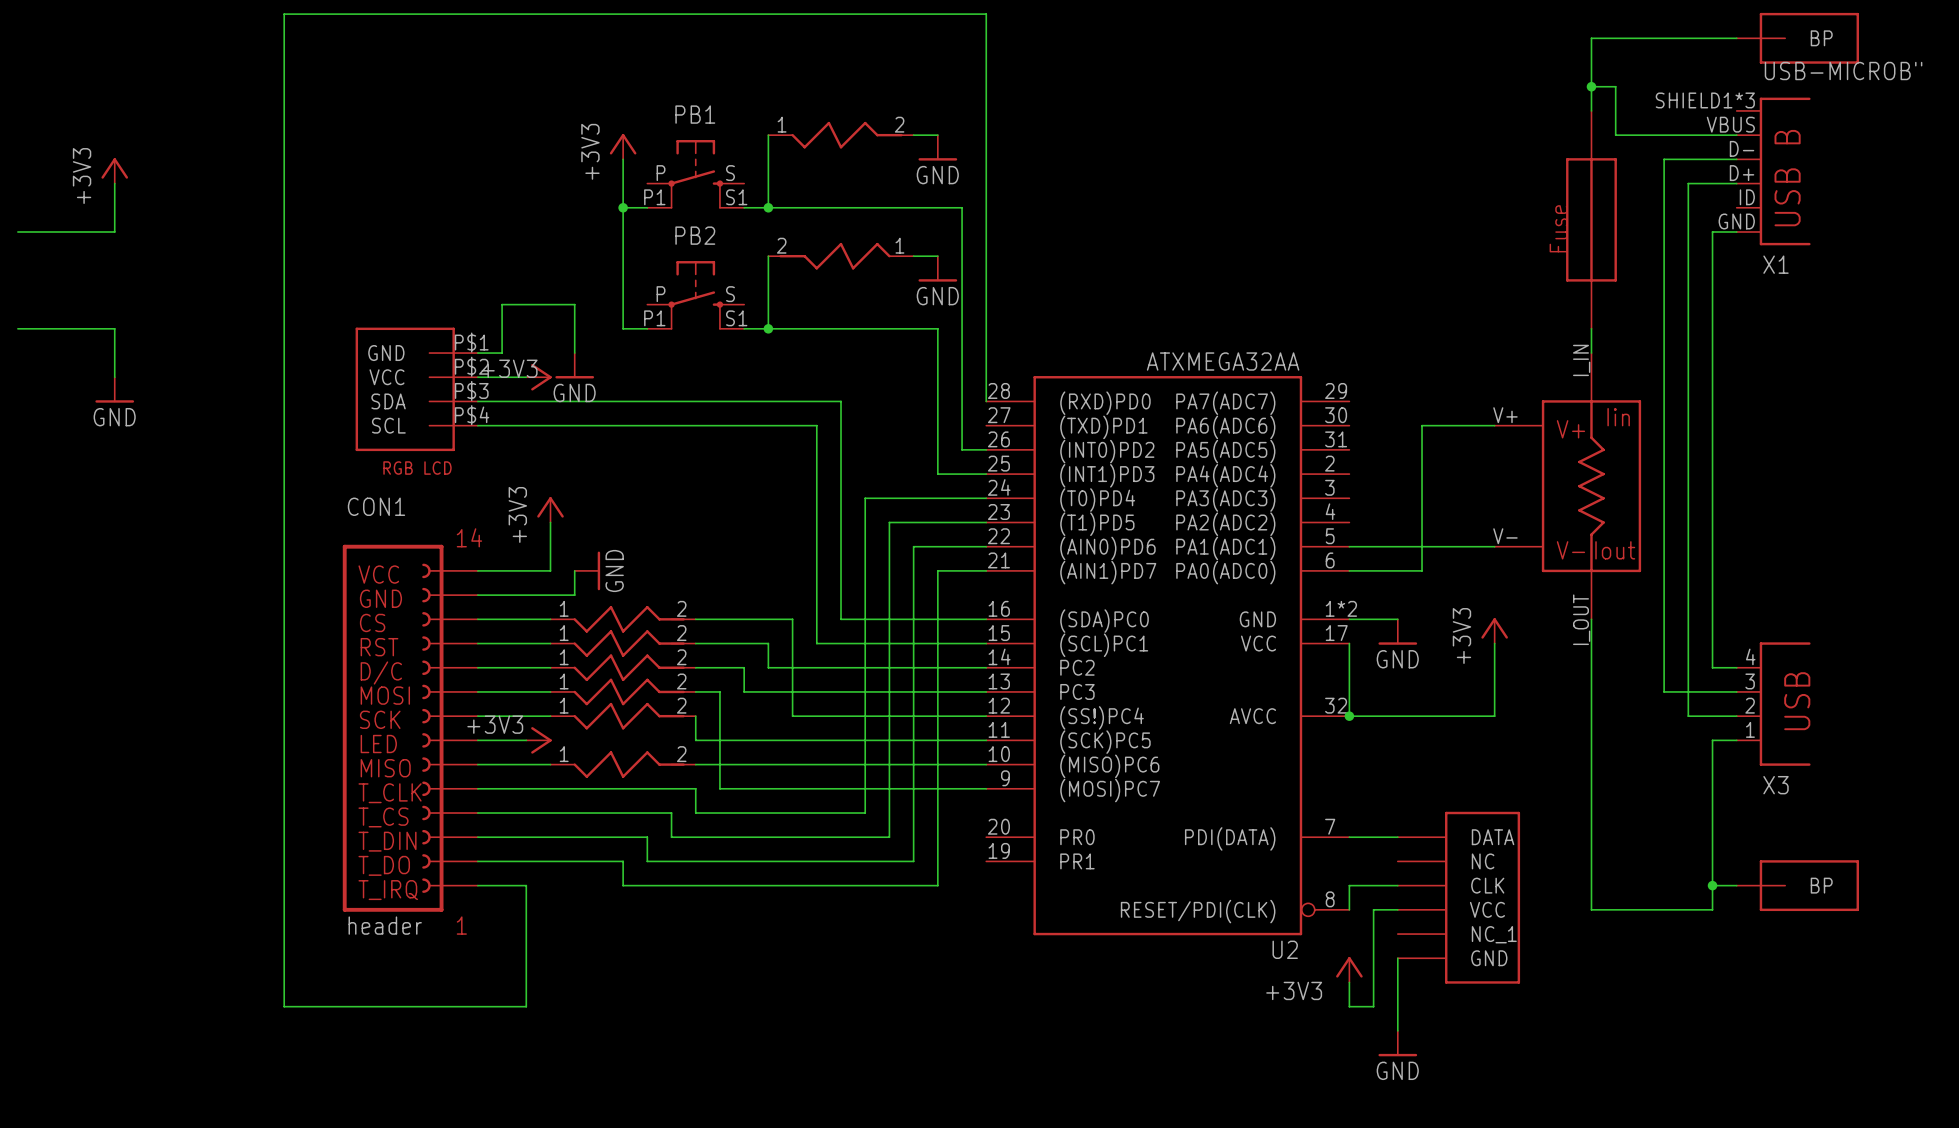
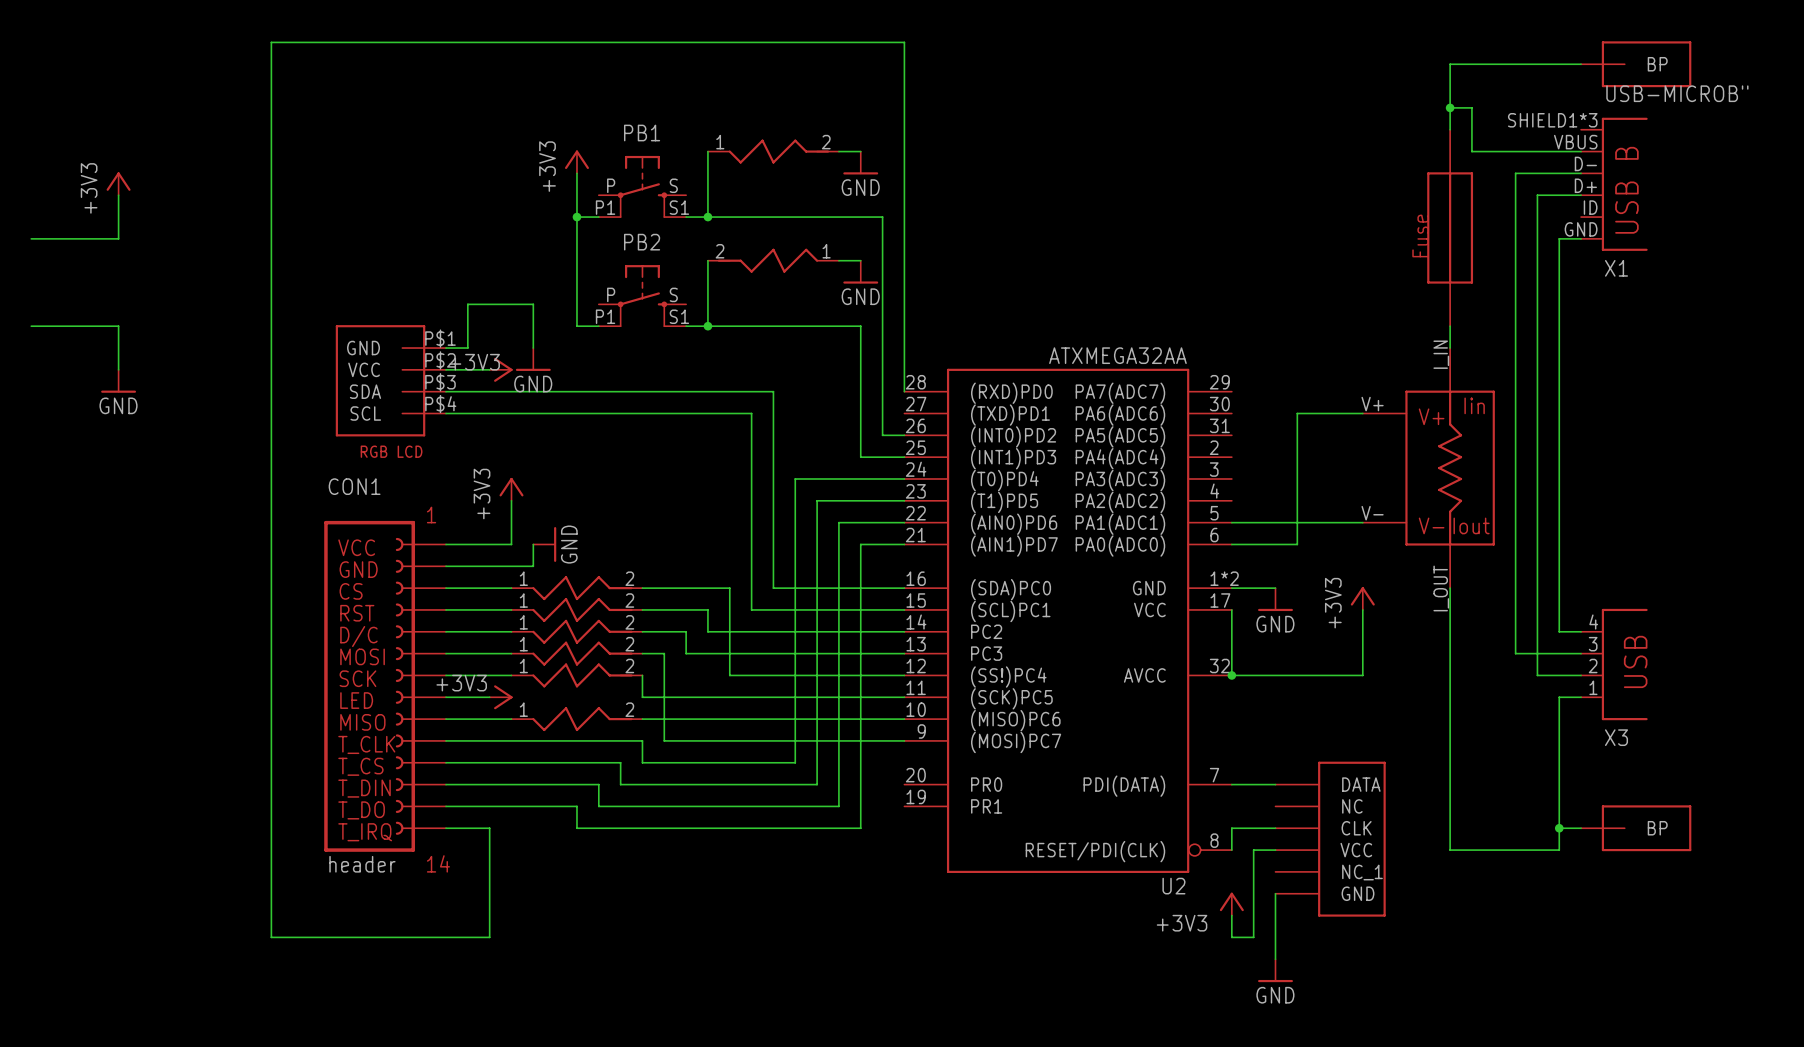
CON1 text: 14 (469, 537) -> 1 (431, 515)
CON1 text: 1 (461, 925) -> 14 (438, 863)

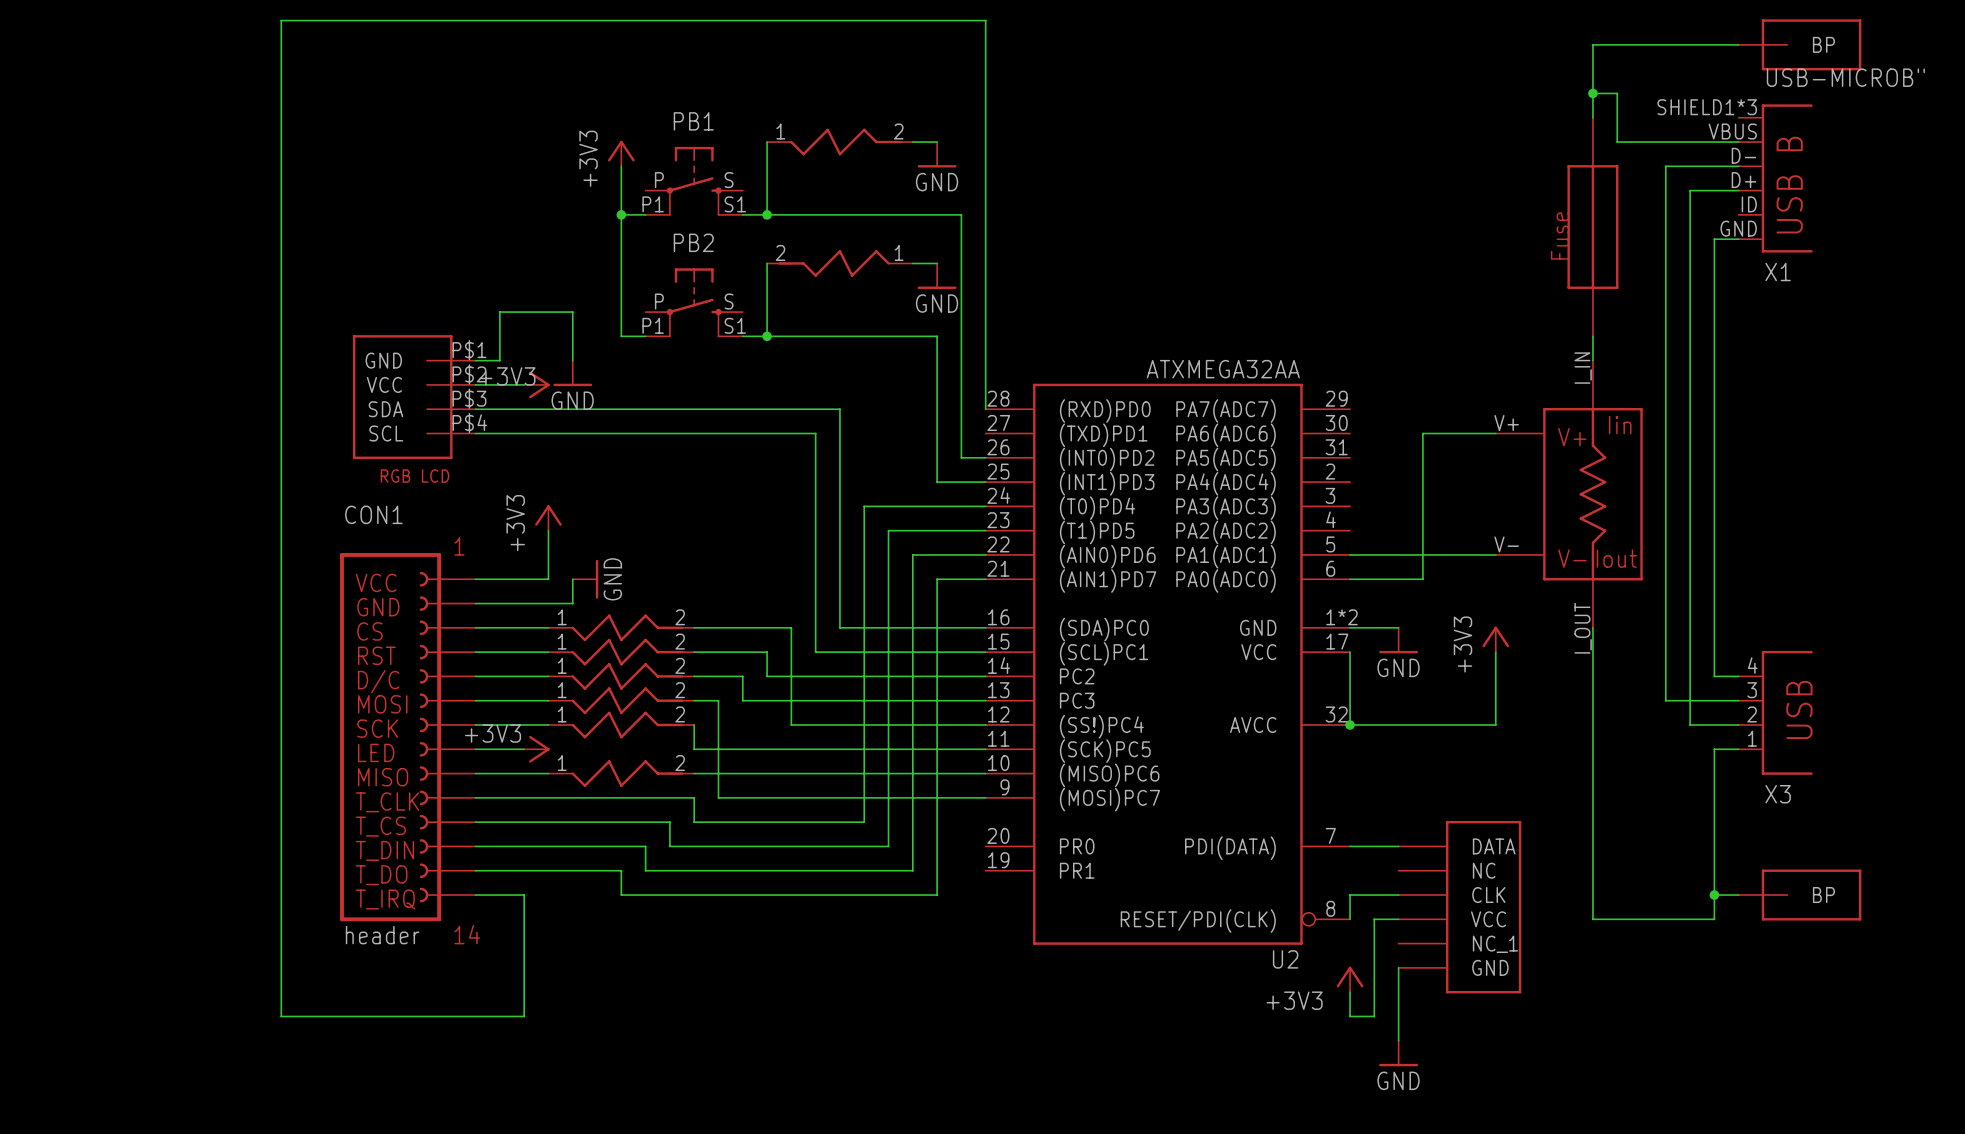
power symbol: +3V3 (118, 183) -> none
wire: (118, 195) (118, 238) (31, 238) -> none
wire: (31, 326) (118, 326) (118, 369) -> none
power symbol: GND (118, 381) -> none

